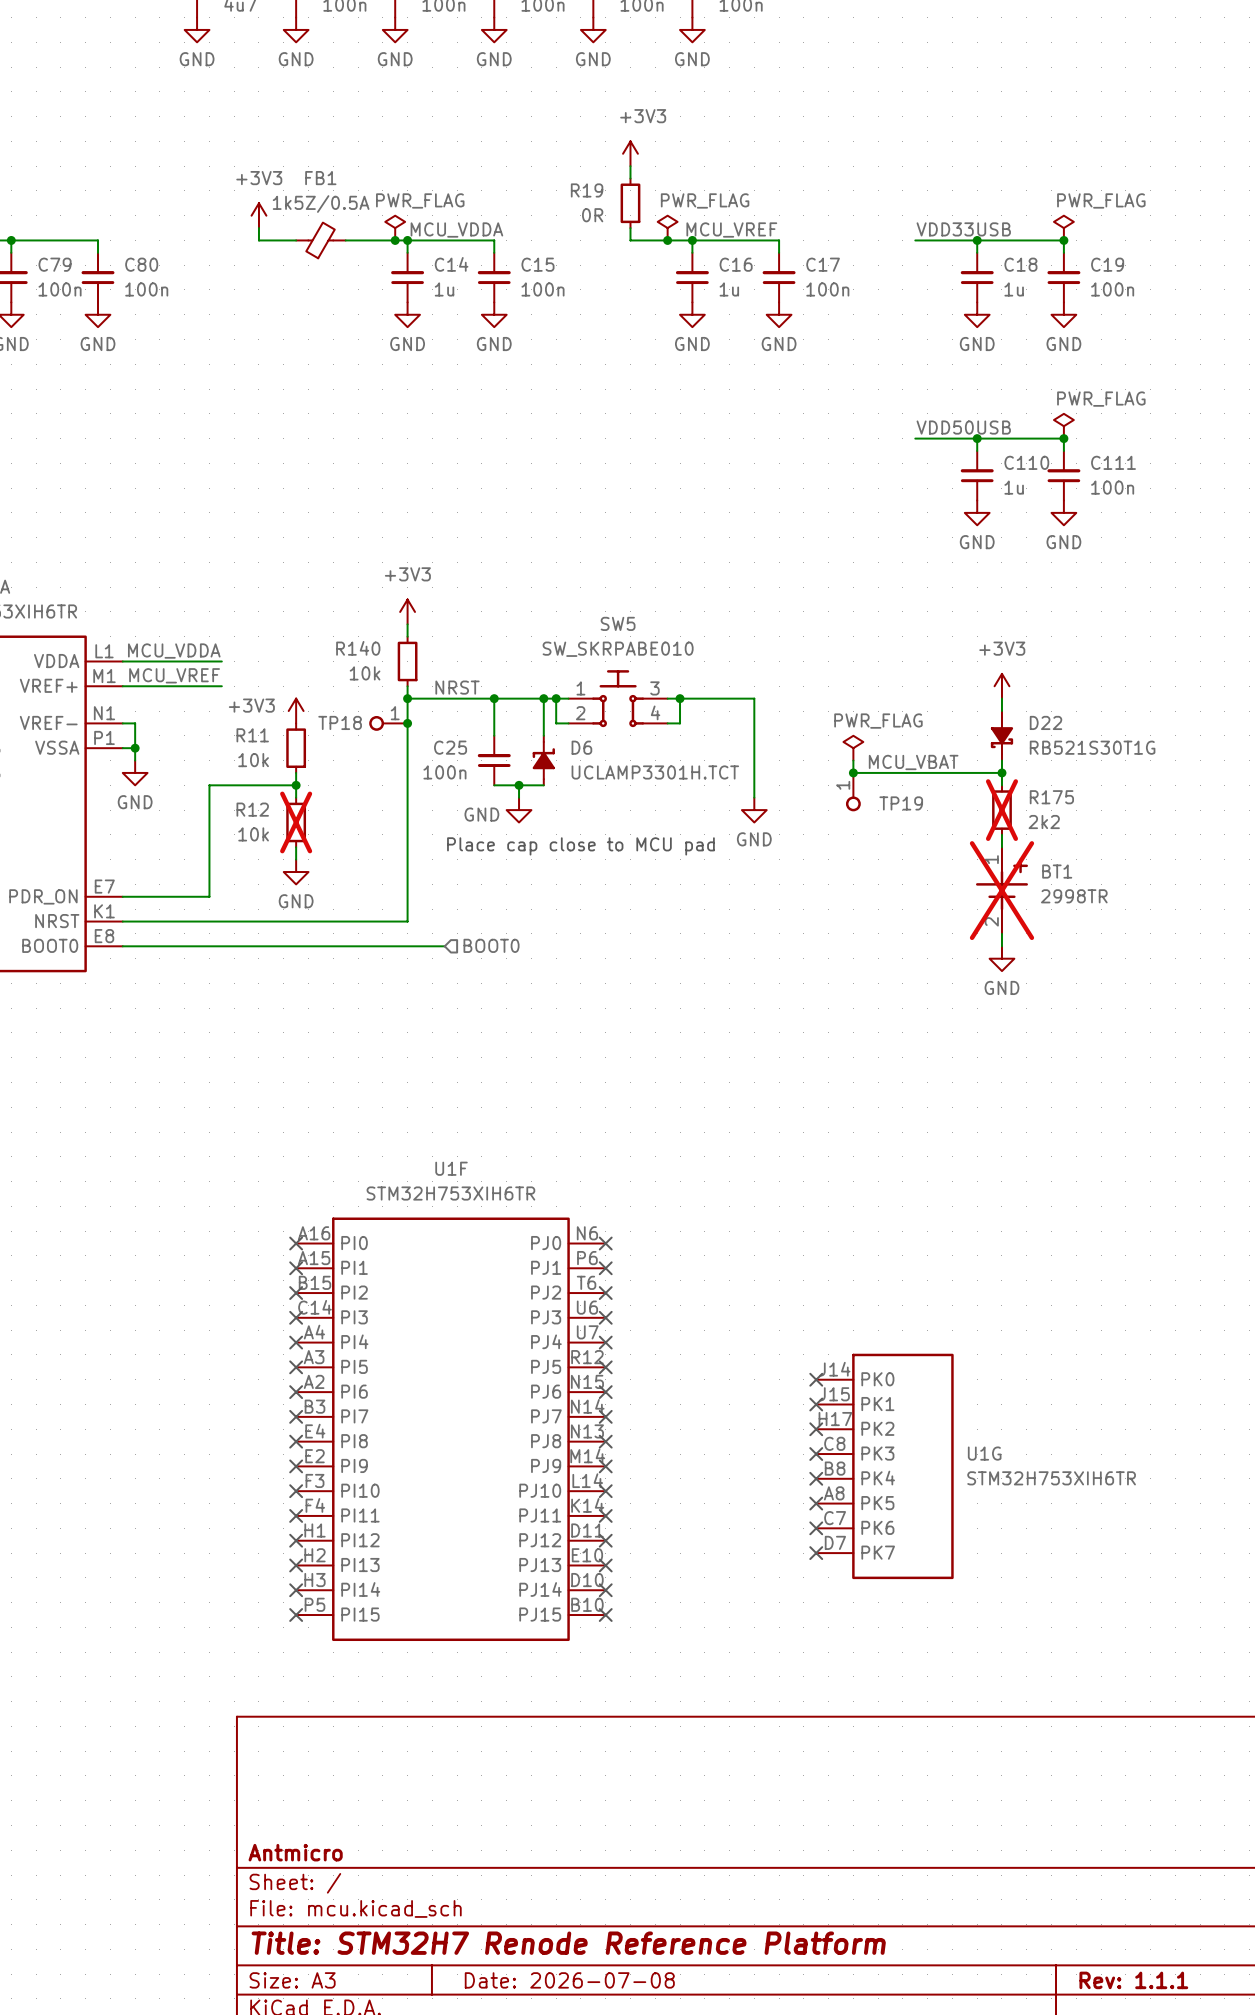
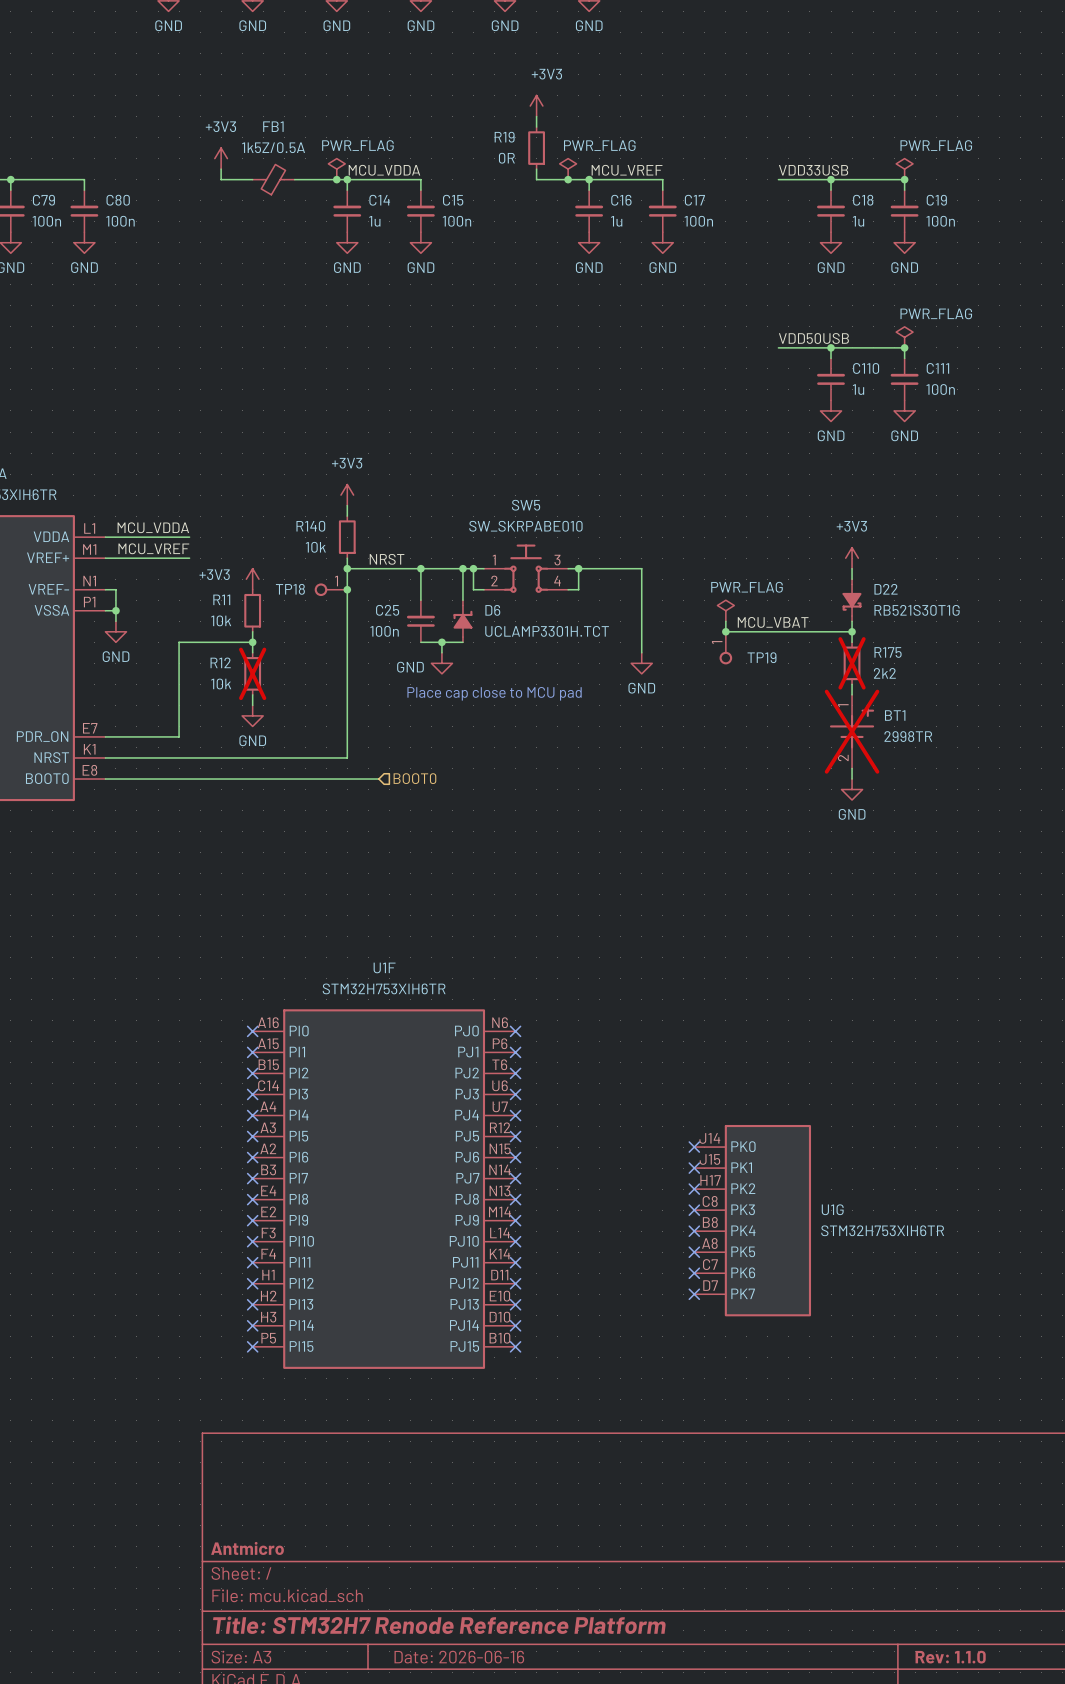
title block: Date: 2026-07-08 (569, 1980) -> Date: 2026-06-16 (459, 1657)
title block: Rev: 1.1.1 (1133, 1980) -> Rev: 1.1.0 (950, 1657)

